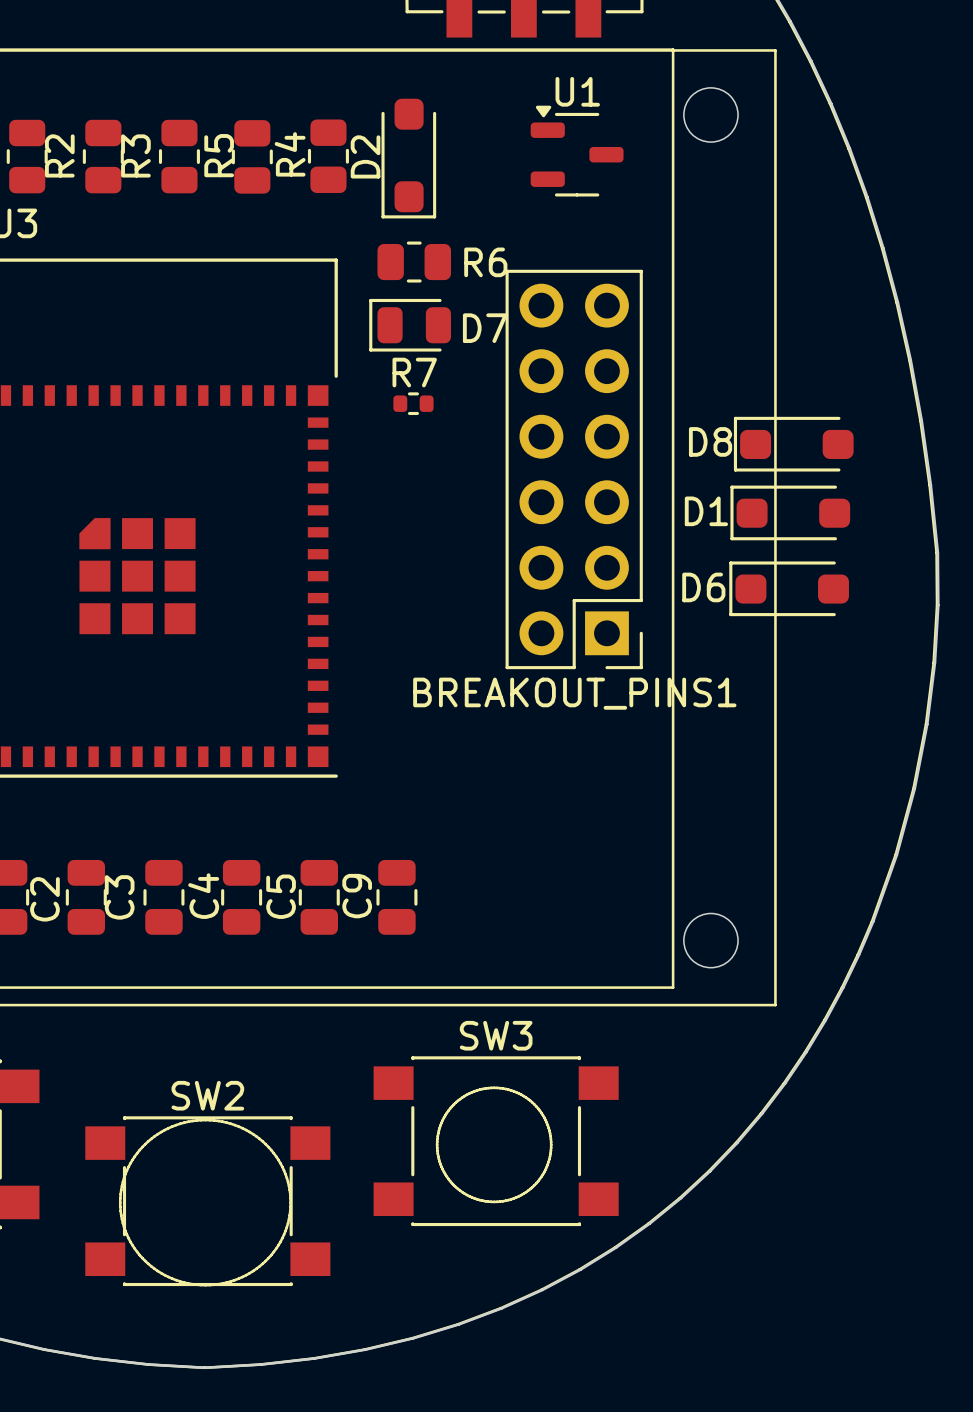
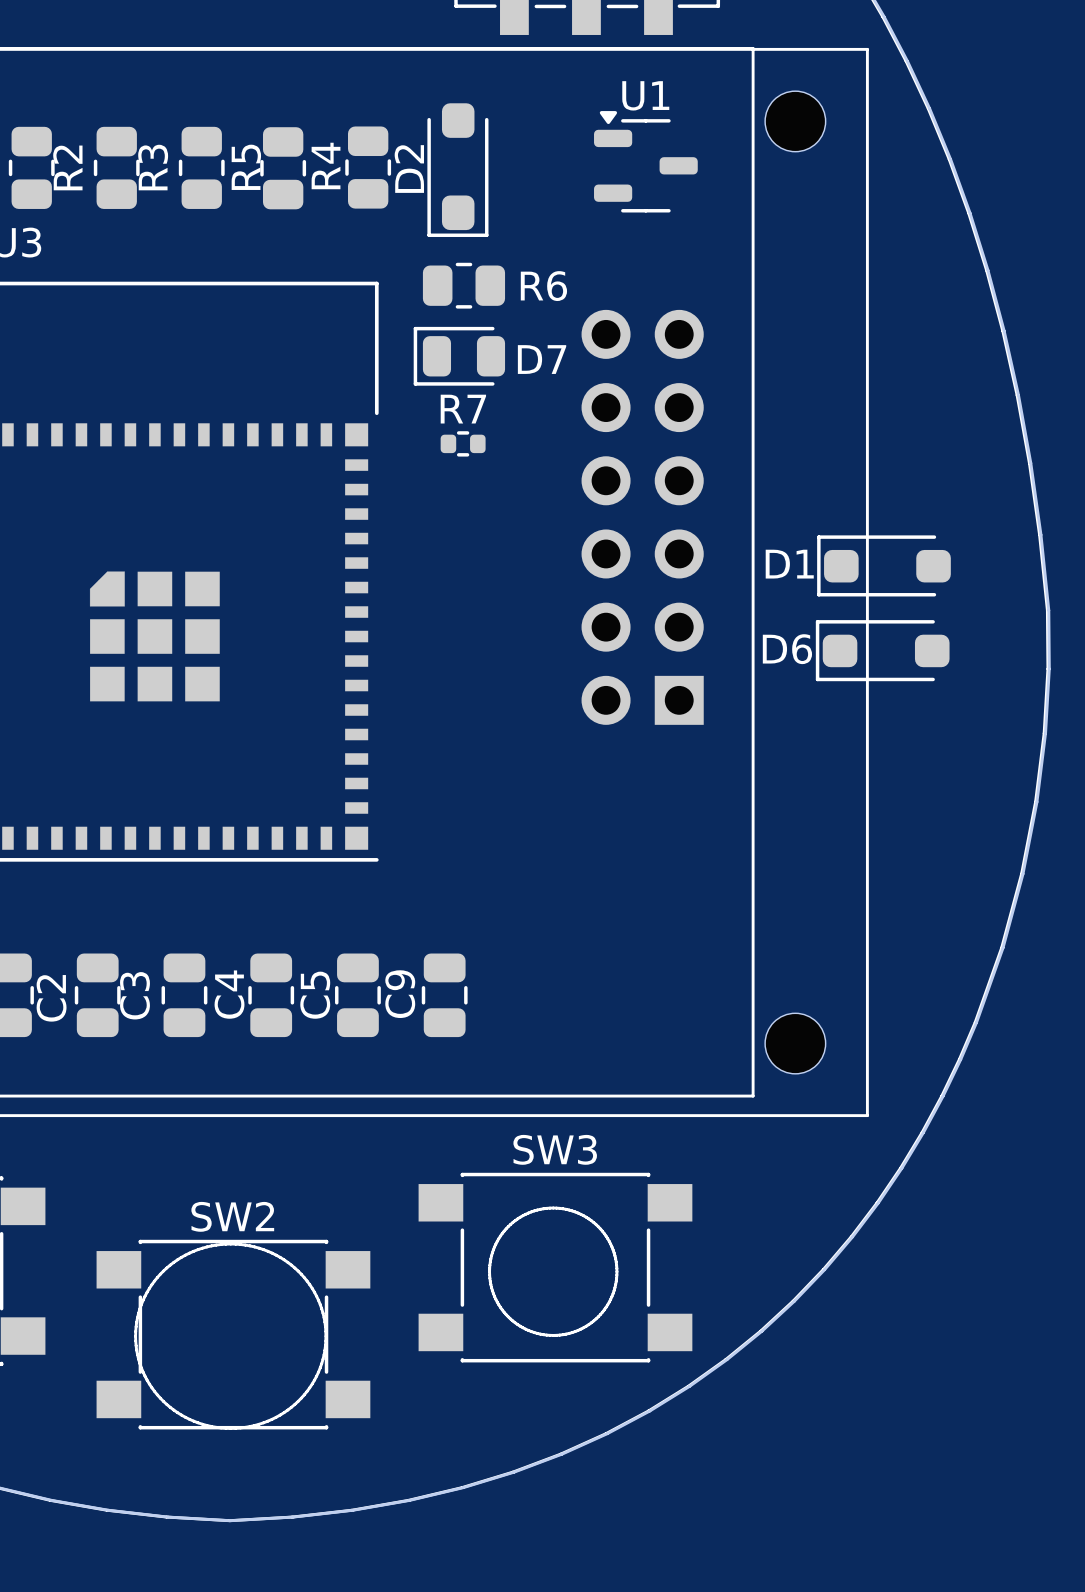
D8: (793, 444) -> none
BREAKOUT_PINS1: (574, 469) -> none

